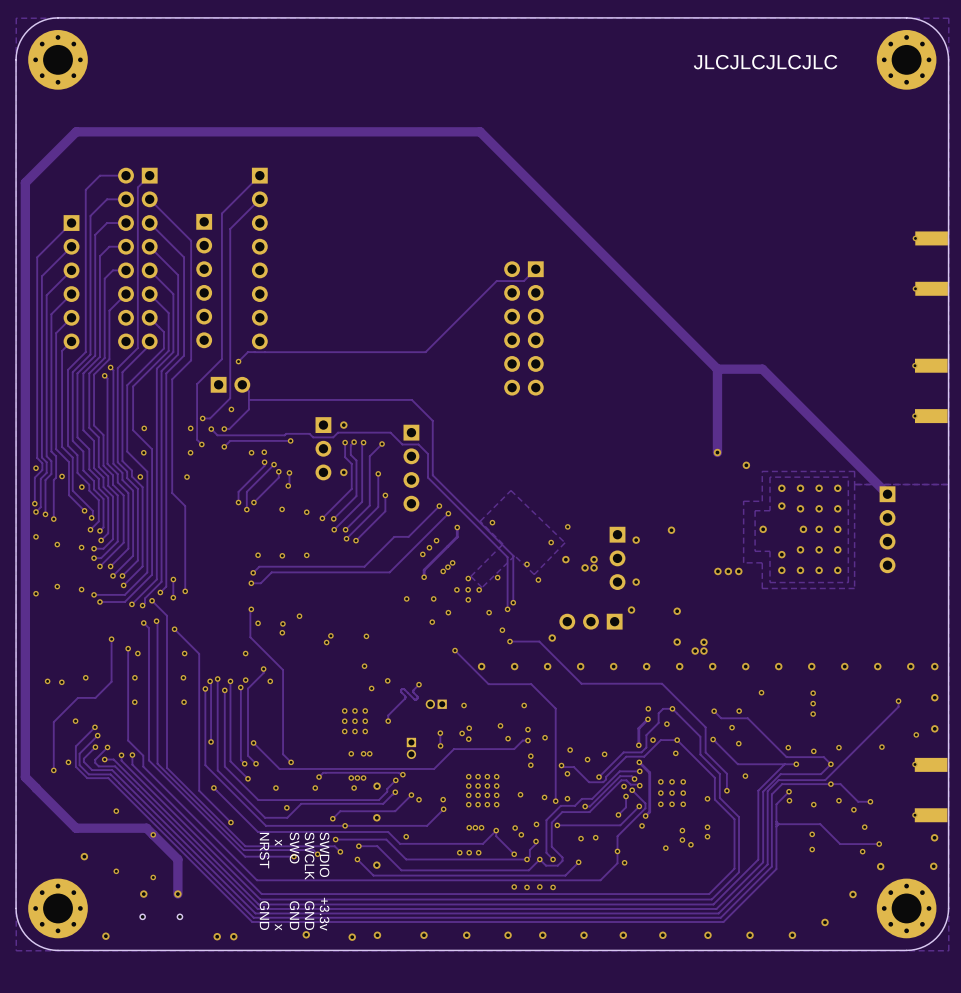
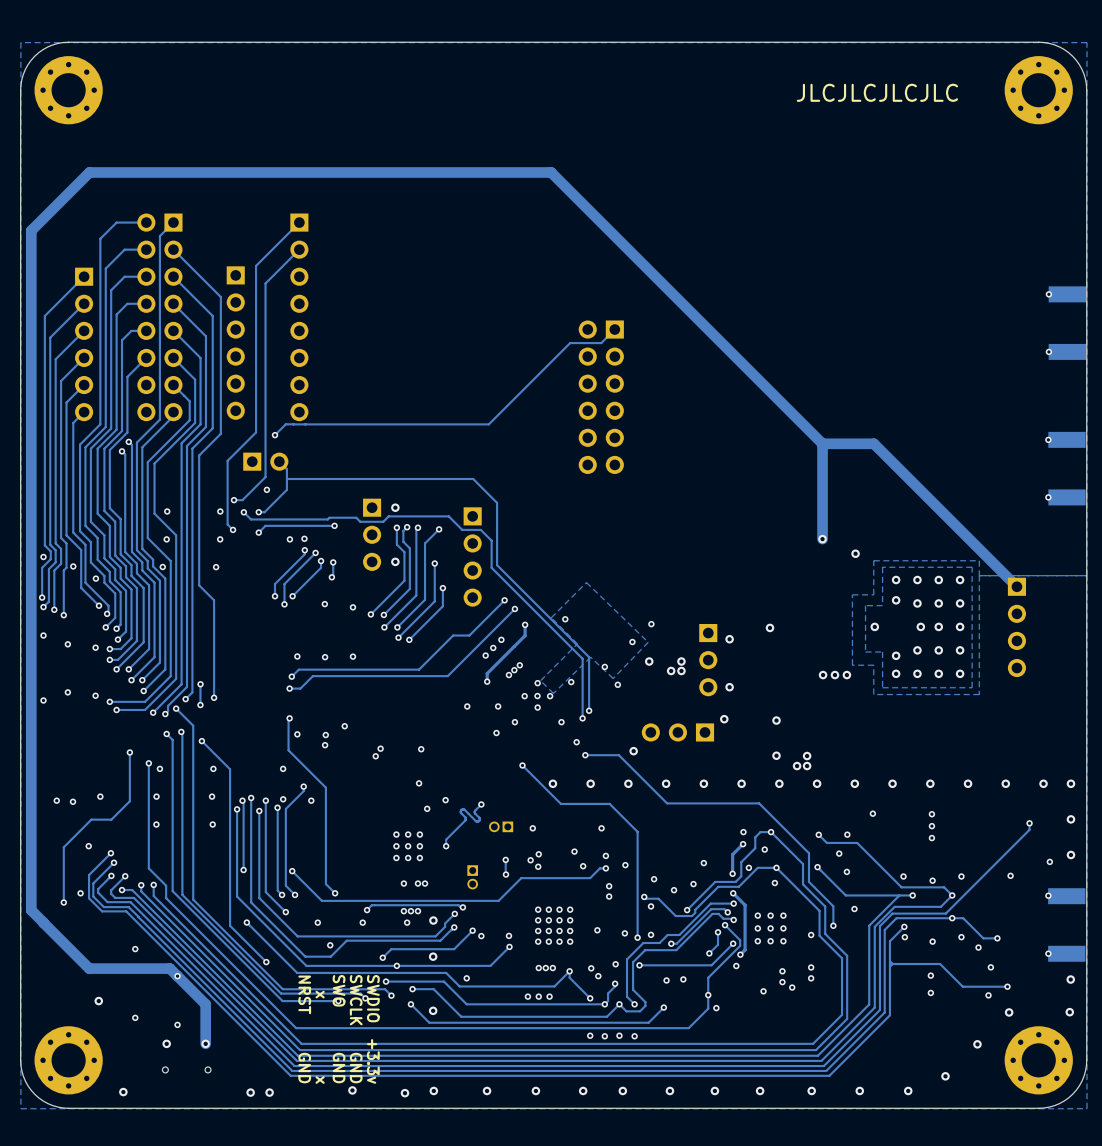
via position: (624, 786) -> (703, 863)

